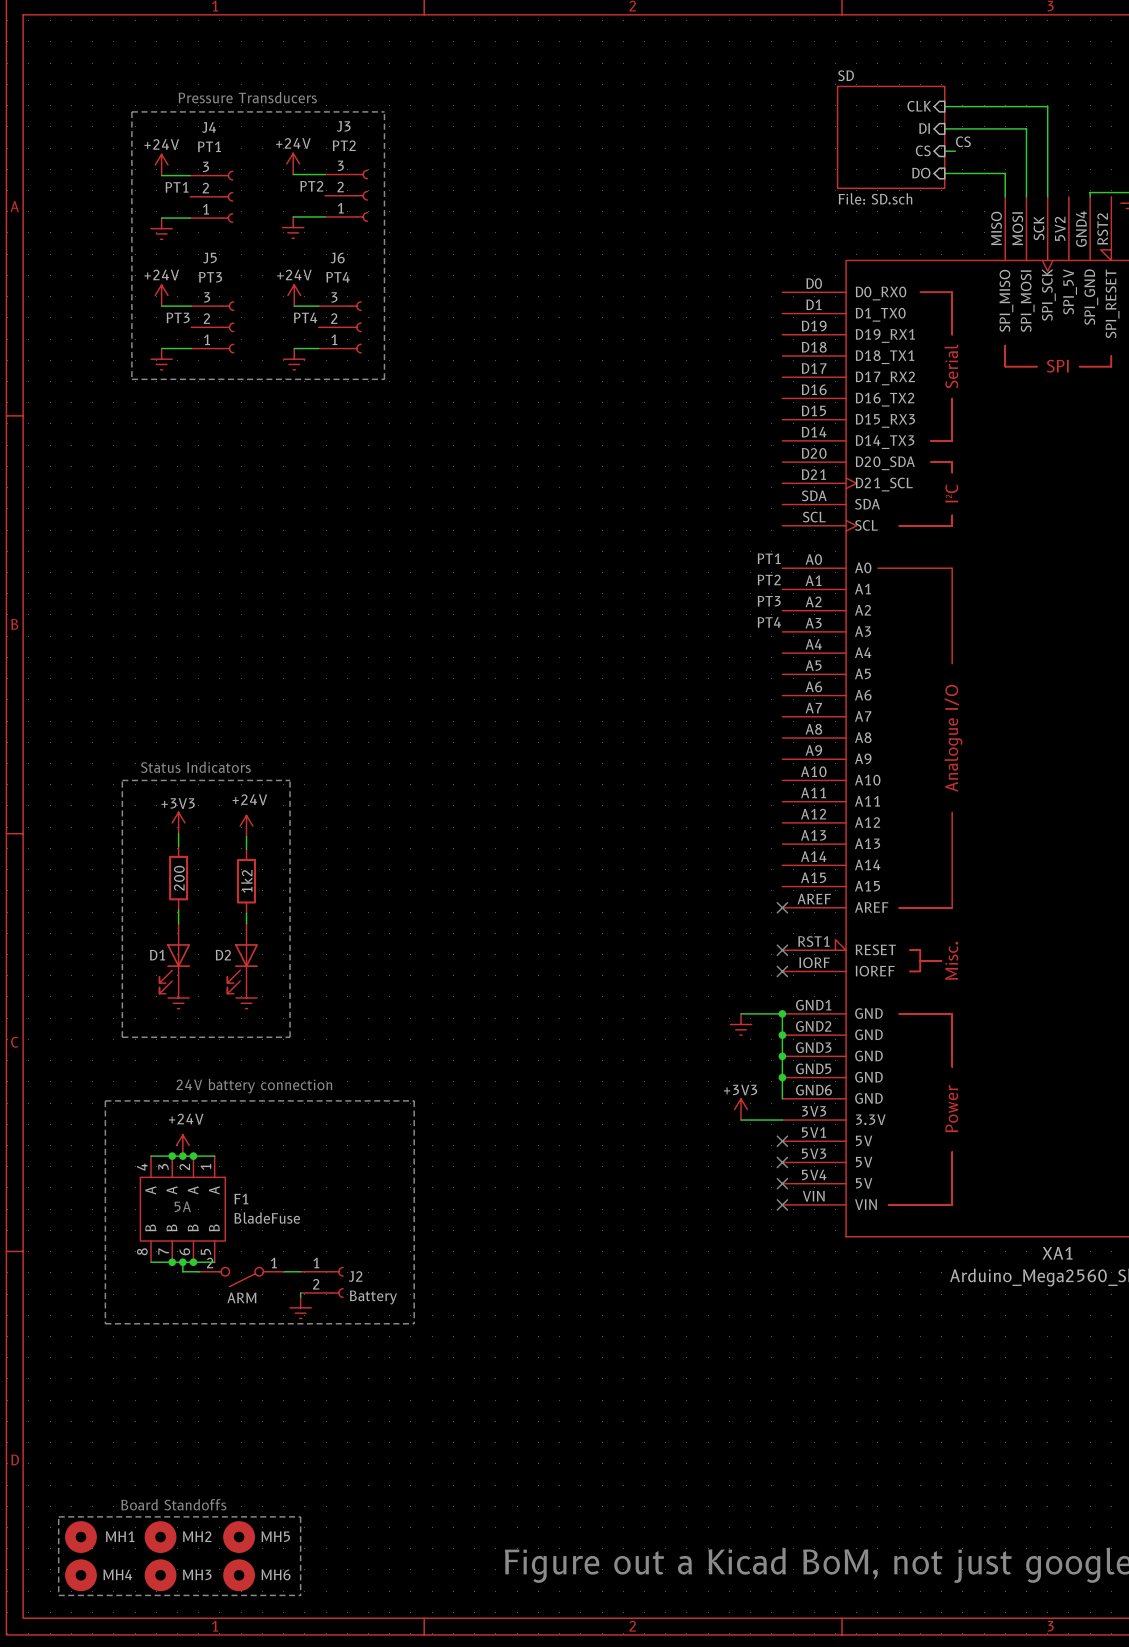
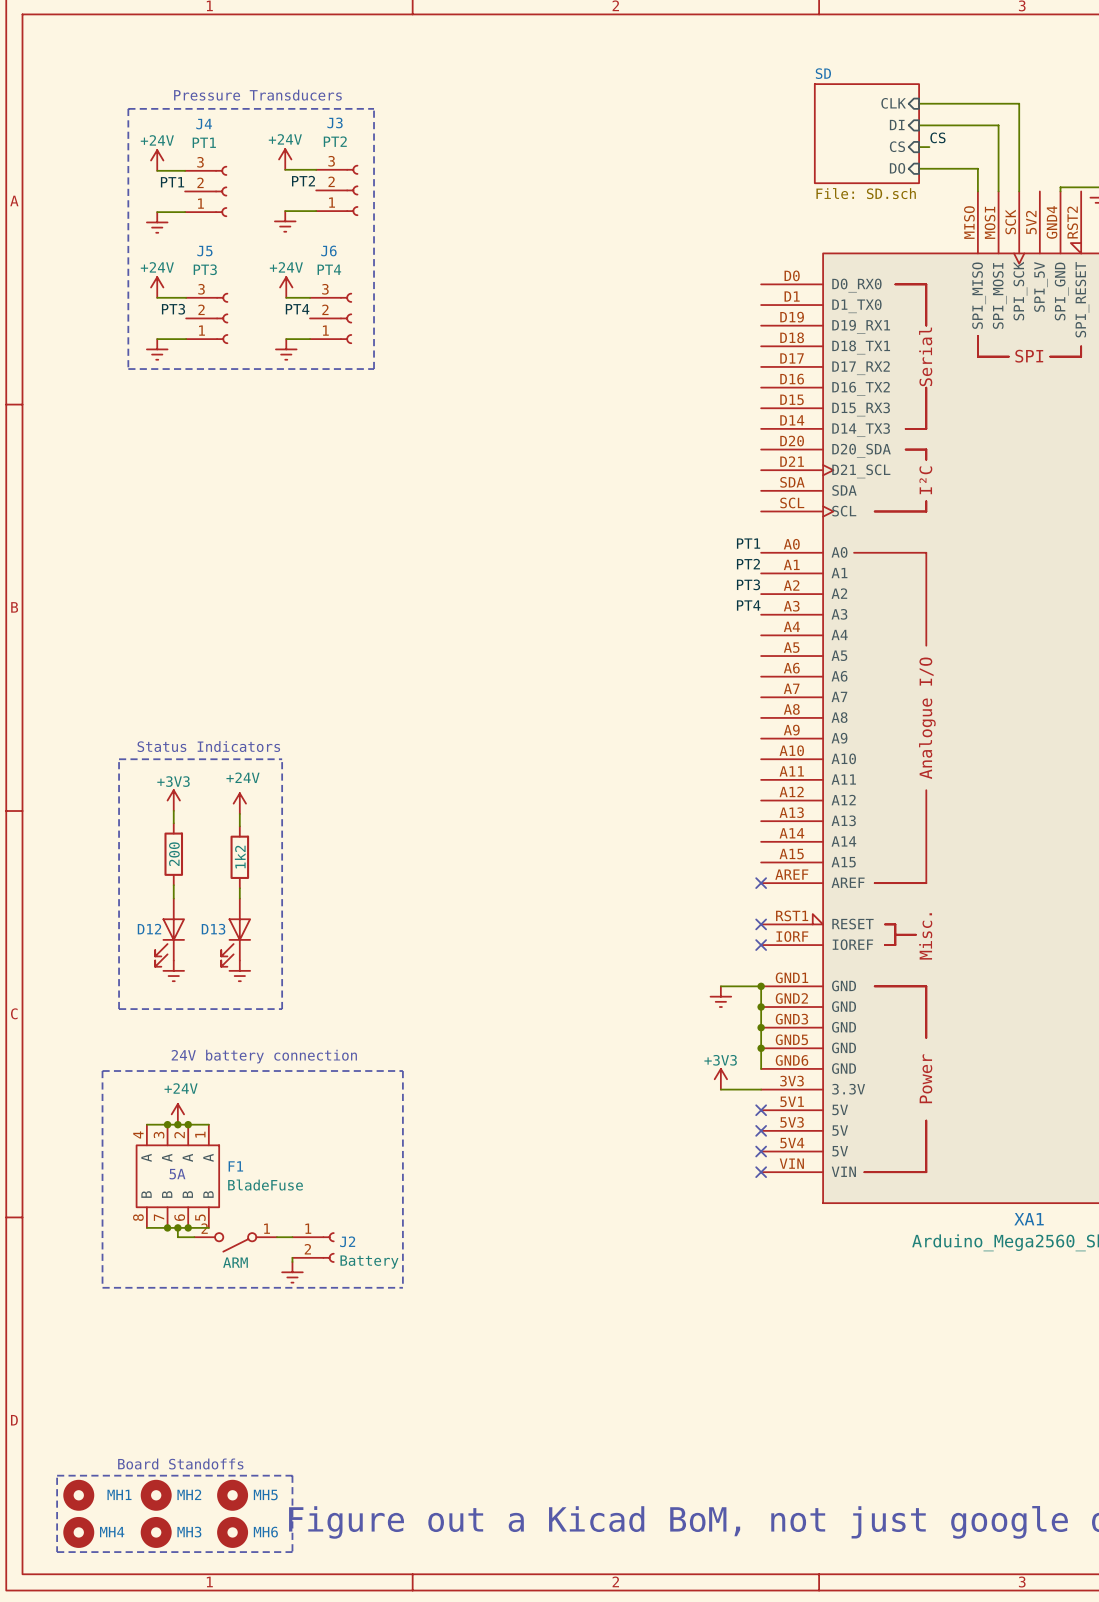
D1 name: D1 (157, 955) -> D12 (149, 929)
D2 name: D2 (223, 955) -> D13 (213, 929)

